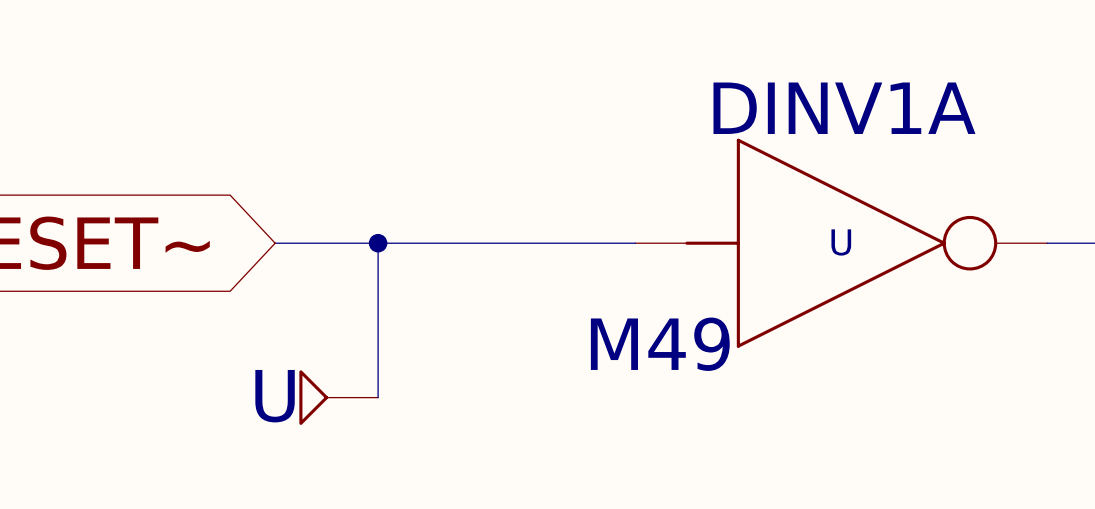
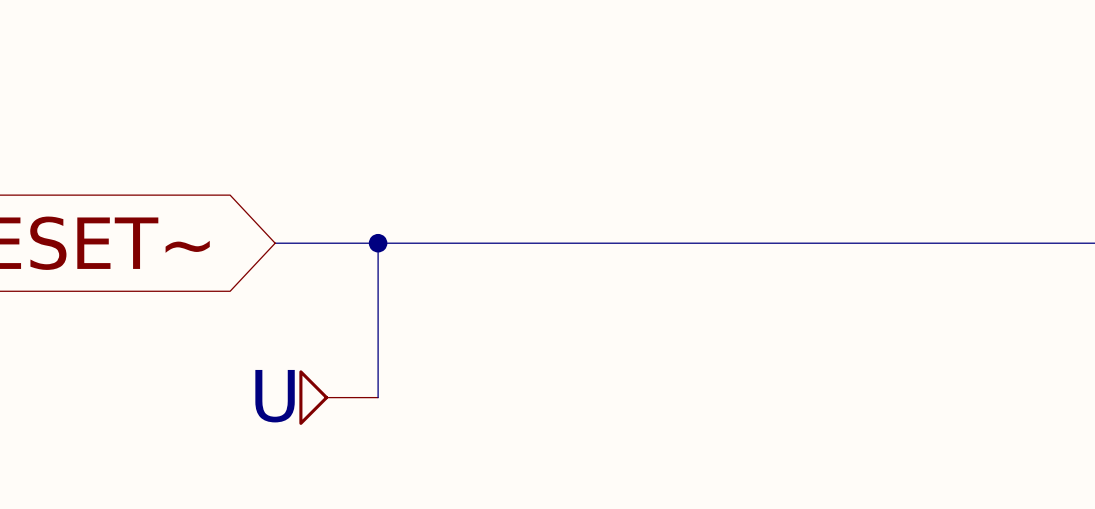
wire: none -> (635, 243) (1047, 243)
U: (841, 243) -> none

